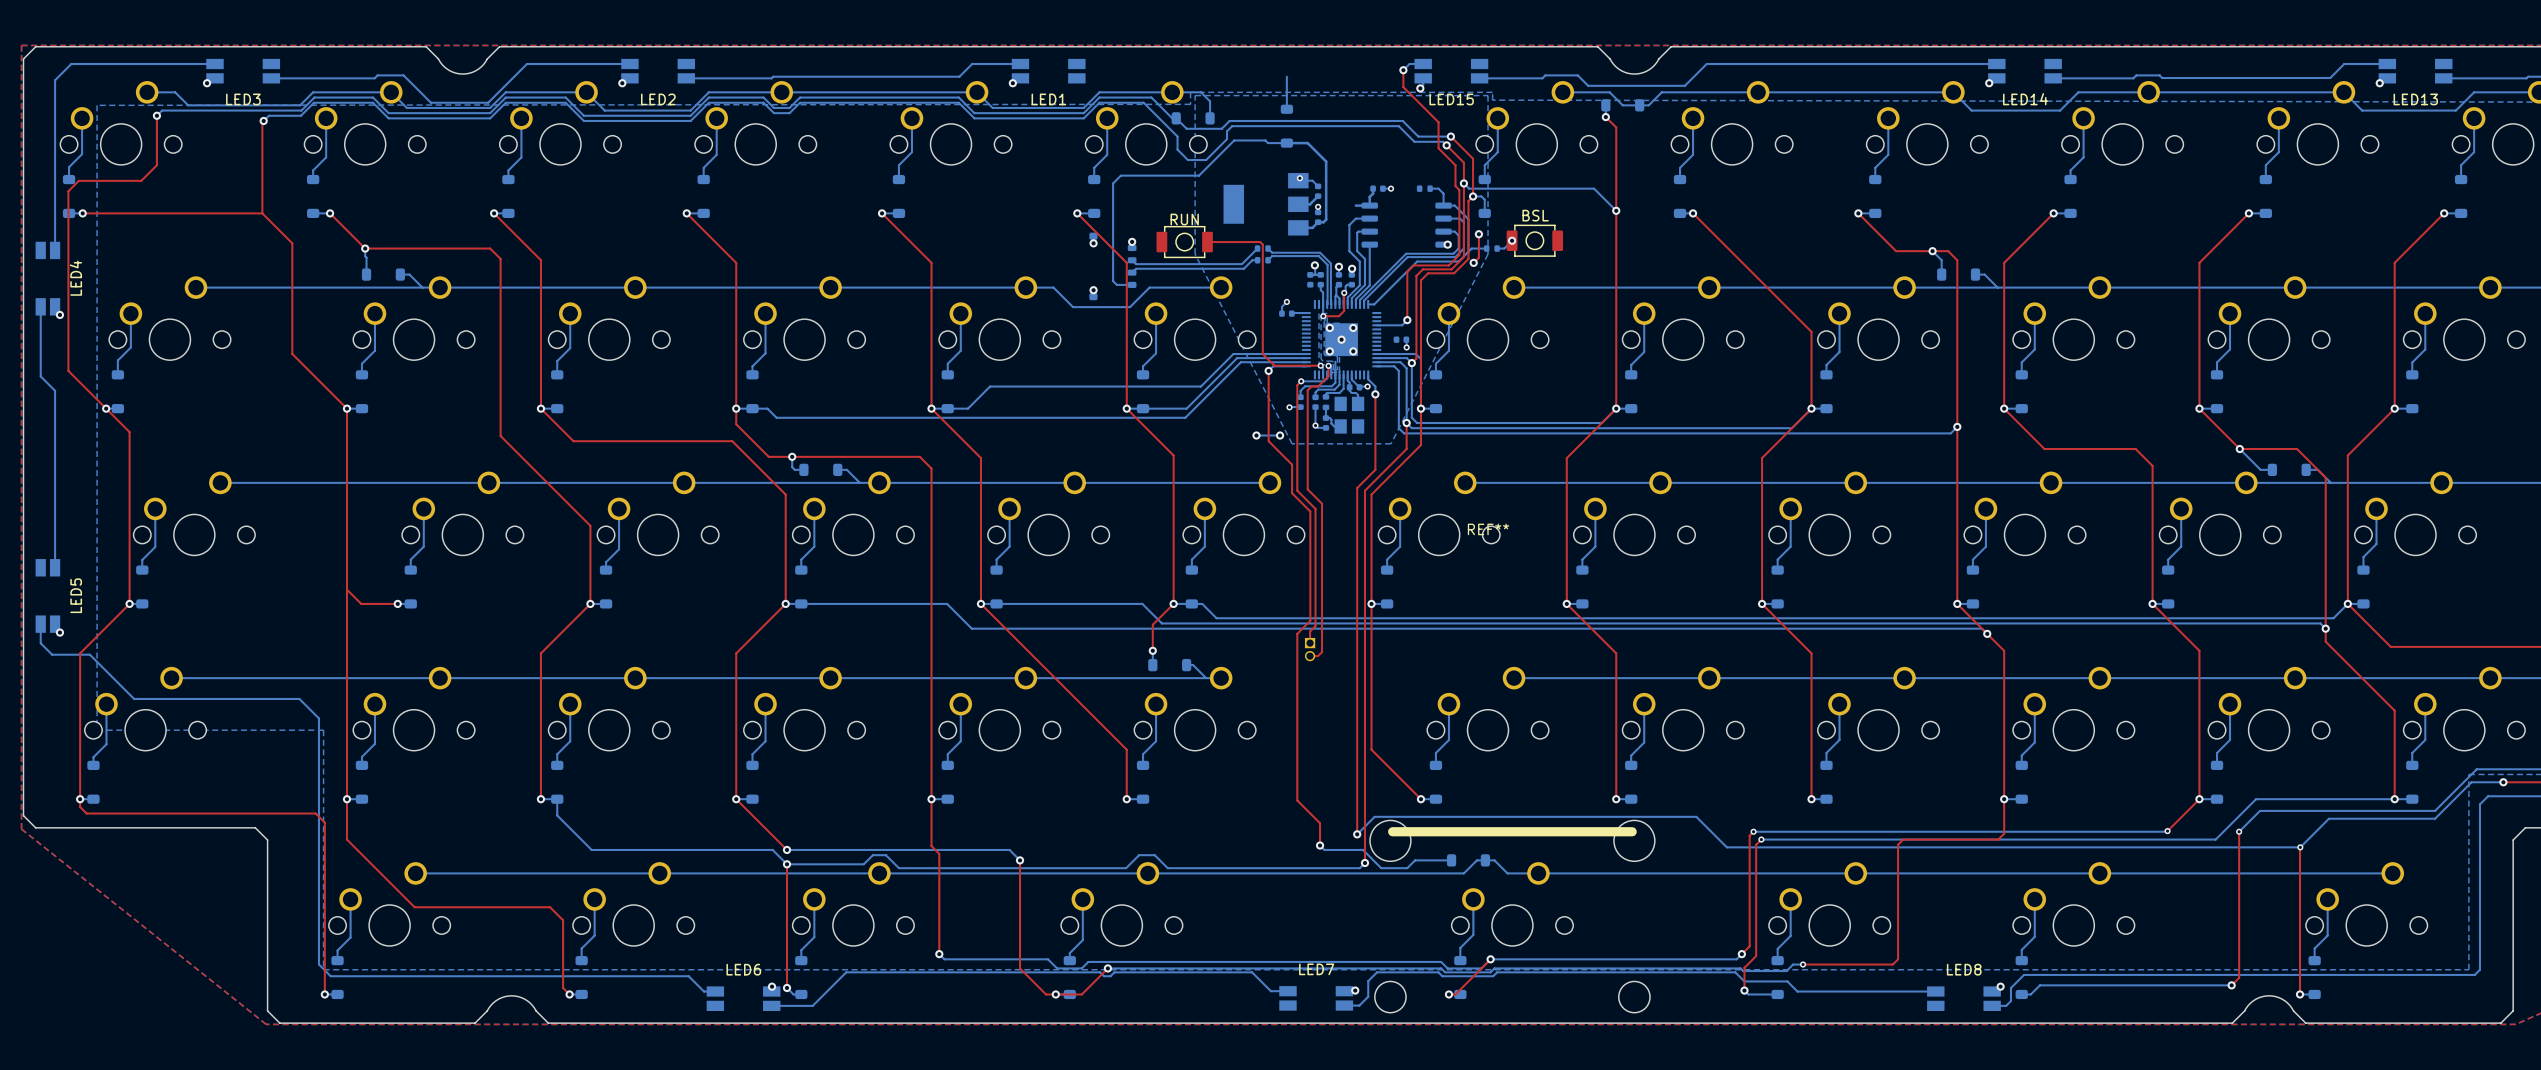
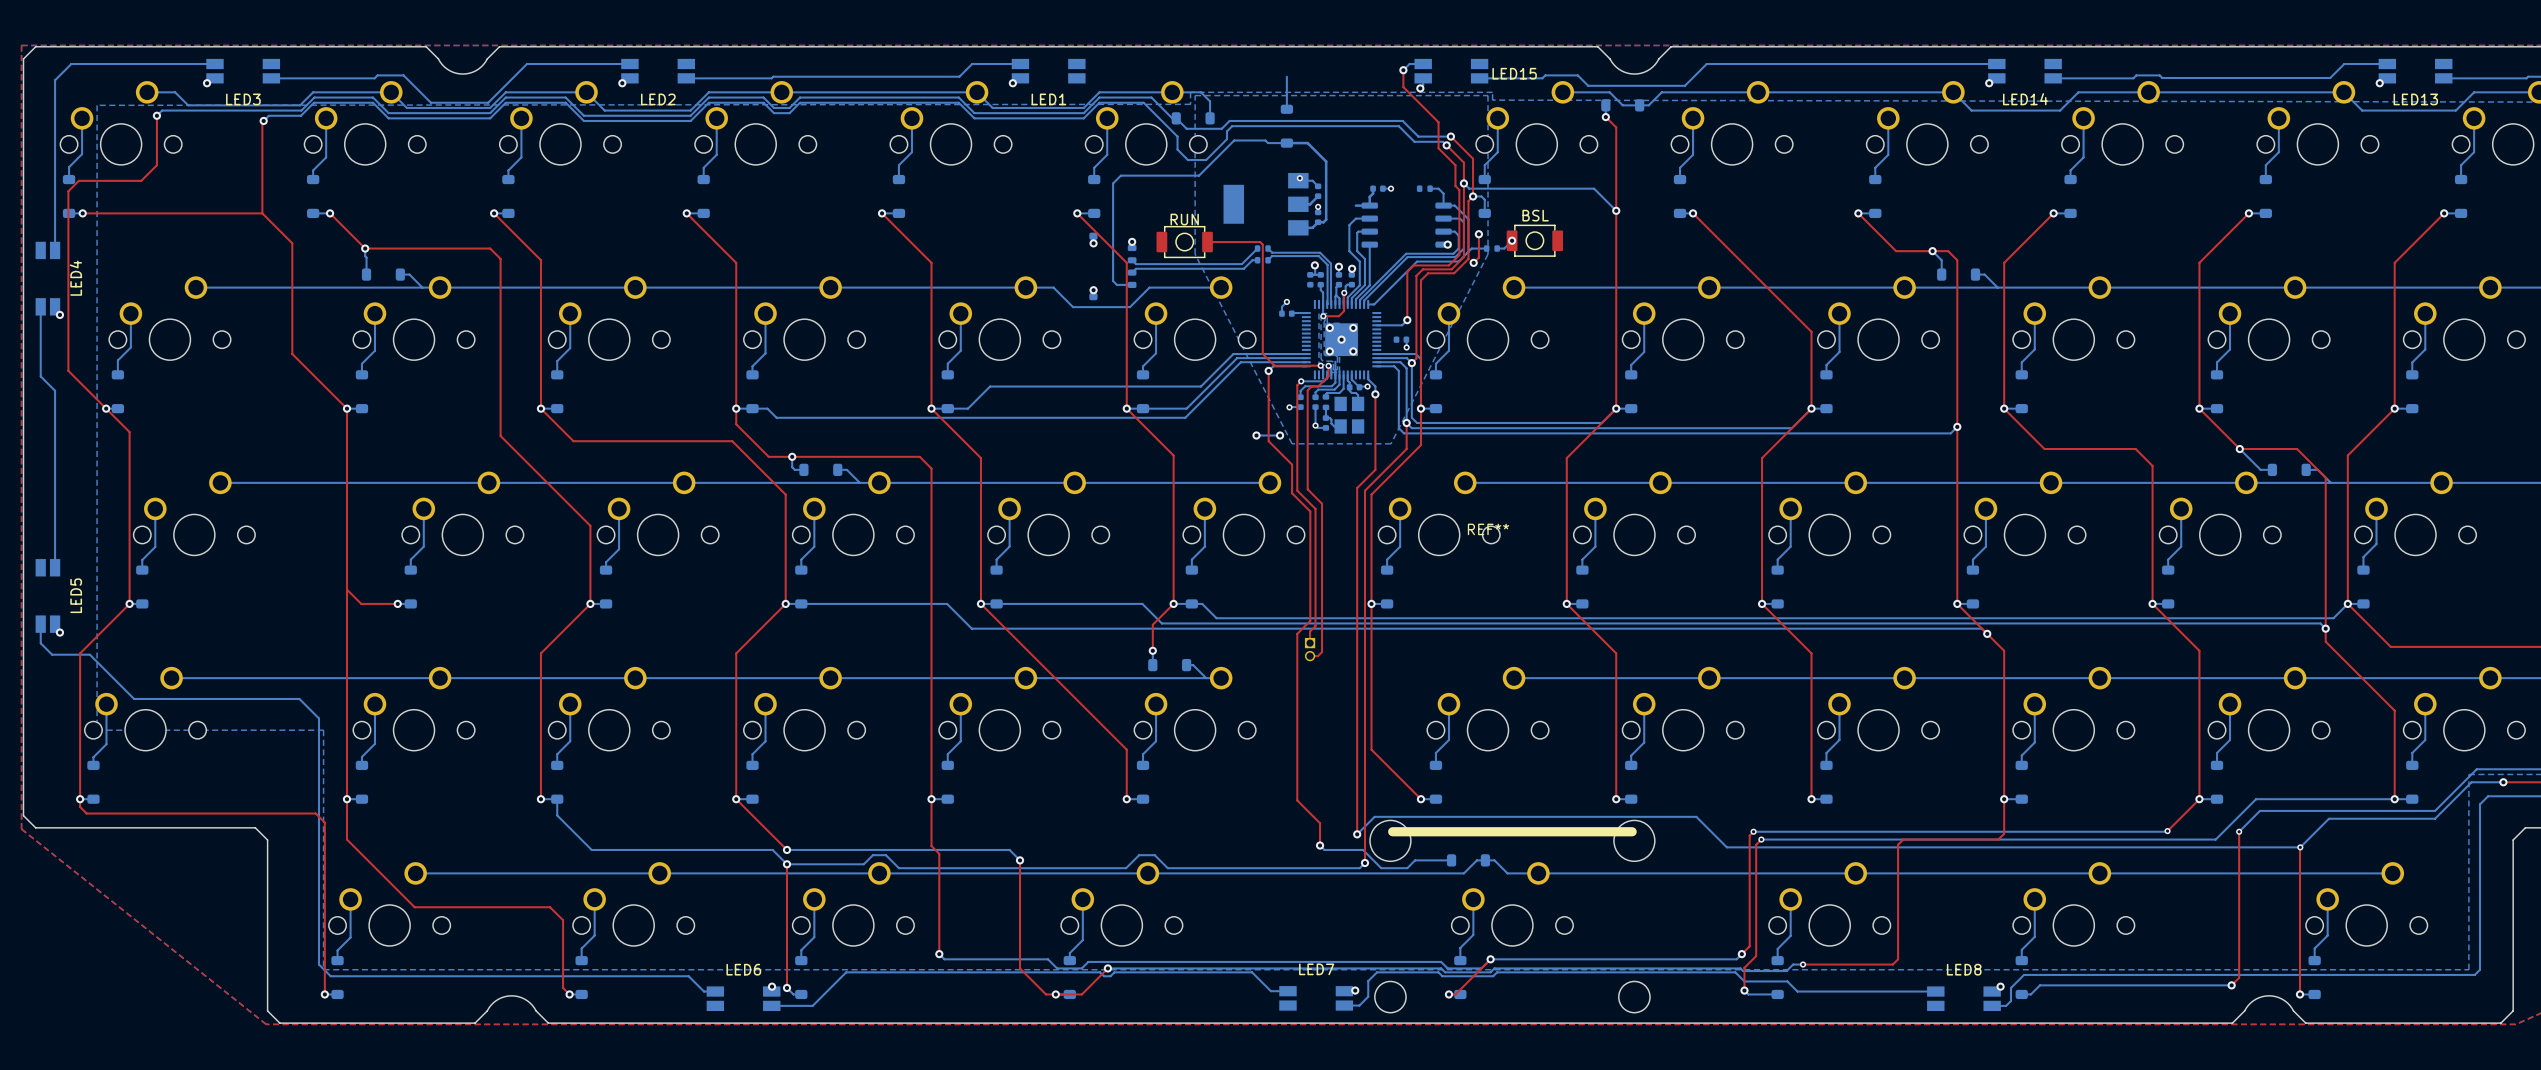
LED15 name position: LED15 (1451, 99) -> LED15 (1514, 73)

